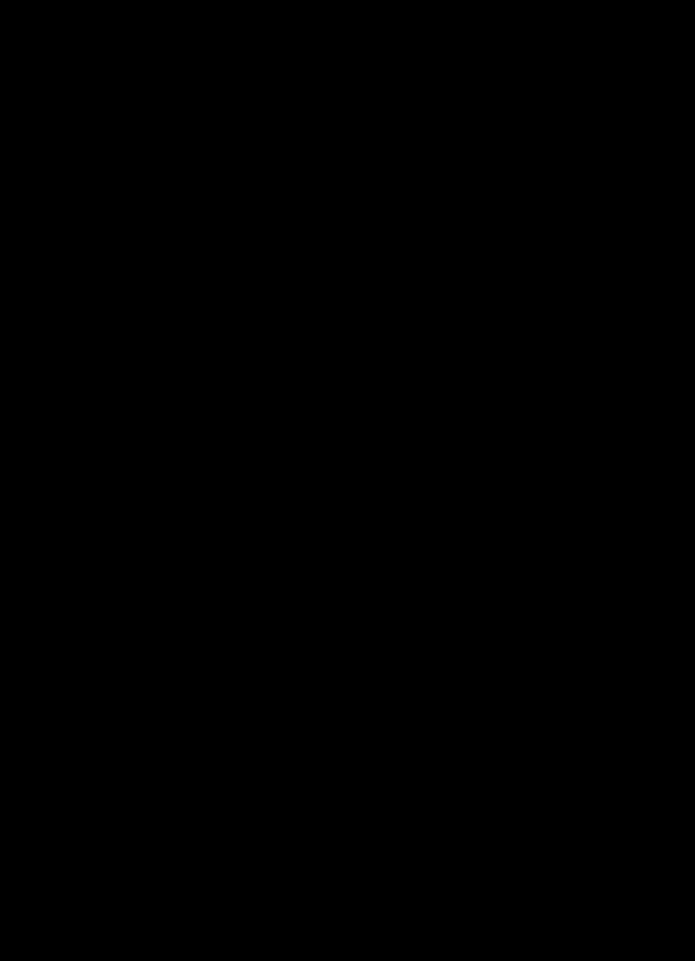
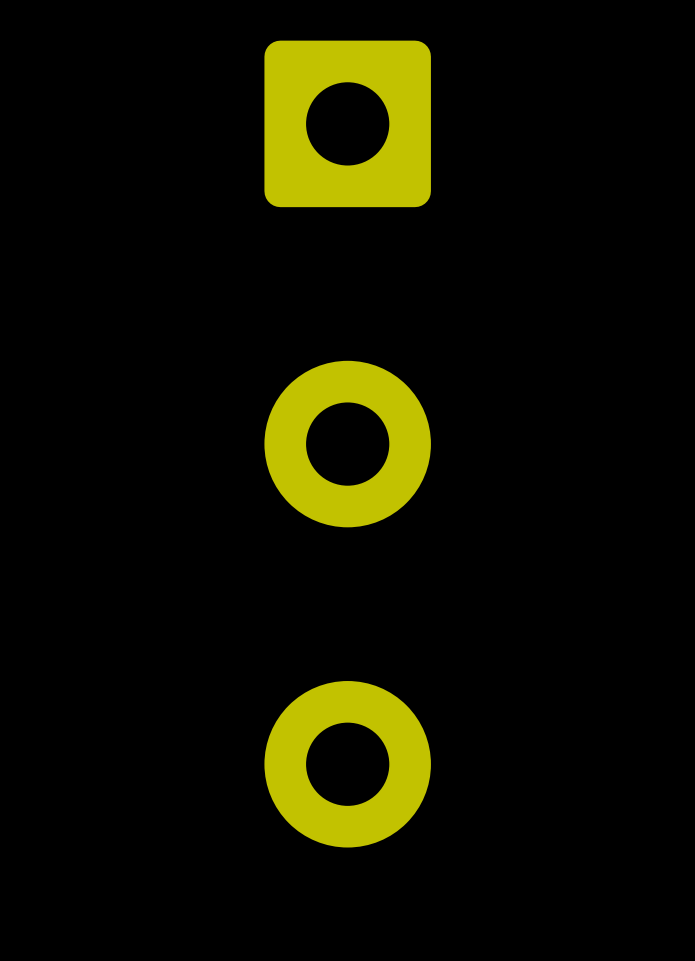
part: none -> (347, 444)

